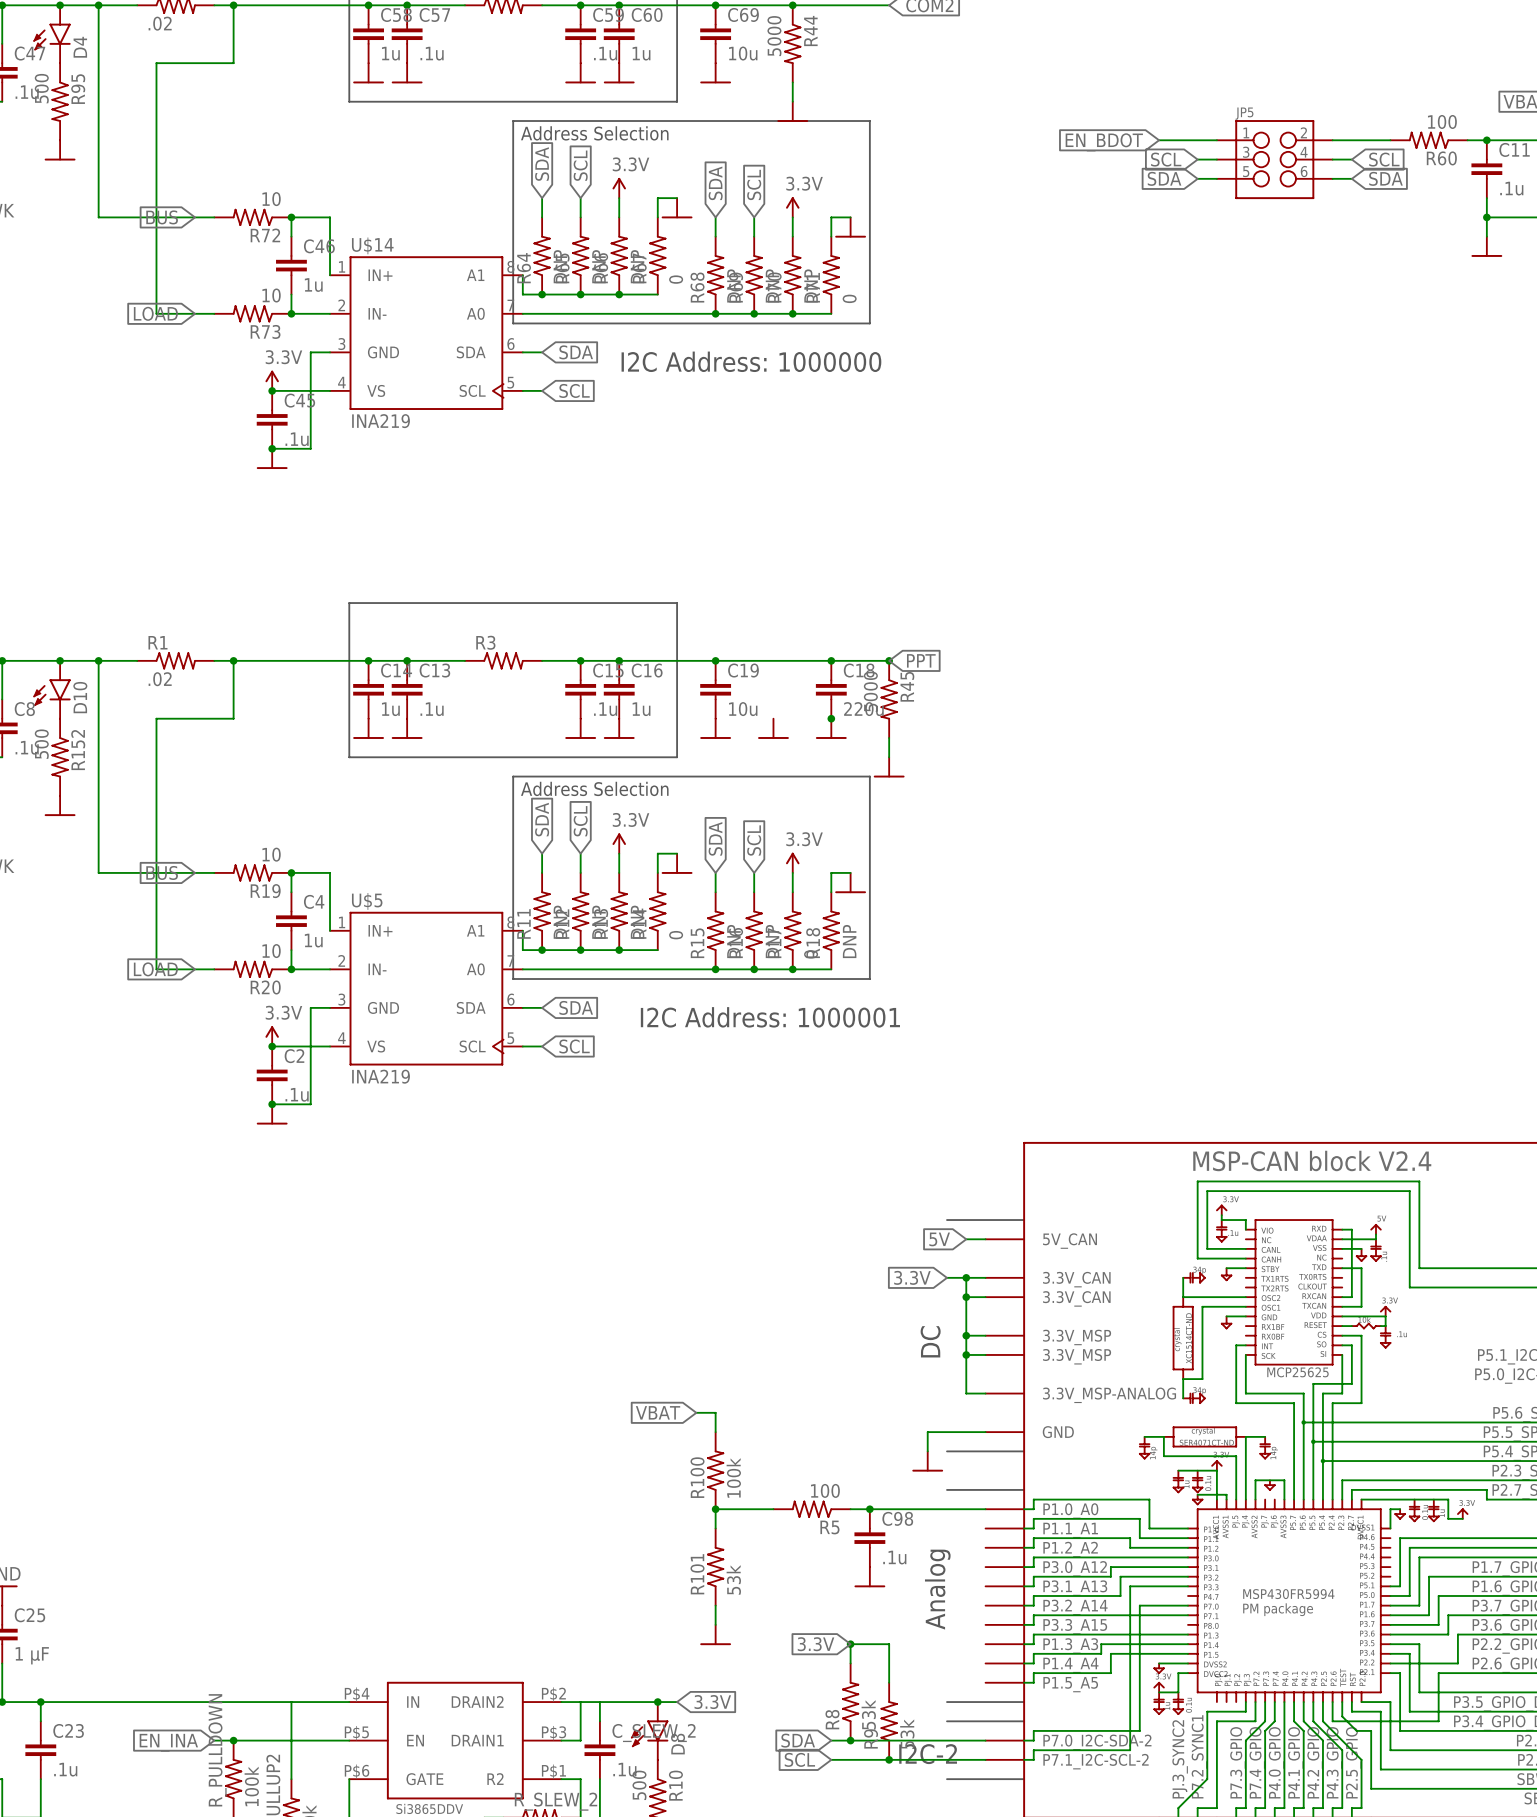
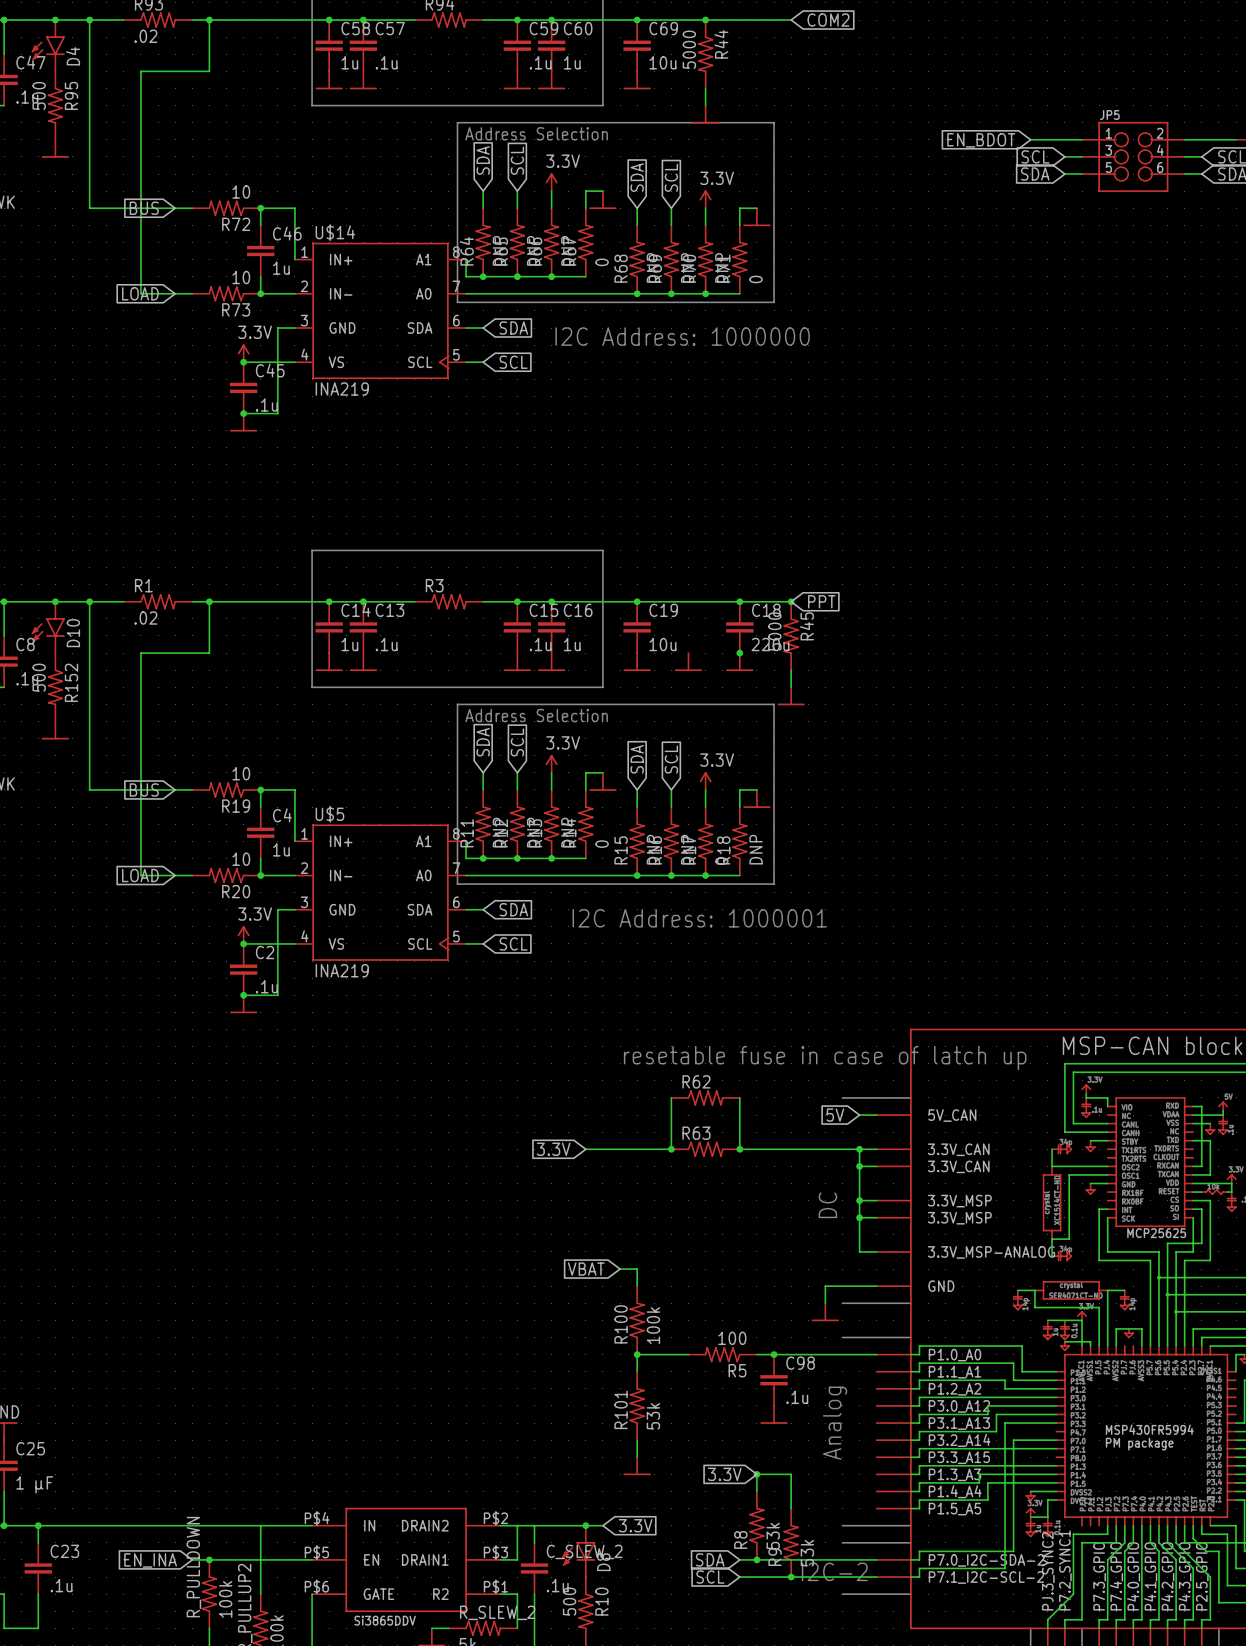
text: none -> resetable fuse in case of latch up (825, 1058)
wire: none -> (671, 1097) (671, 1149) (585, 1149)
R62: none -> (705, 1097)
wire: none -> (739, 1097) (739, 1149) (842, 1149)
global label: none -> 3.3V (553, 1149)
junction: none -> (671, 1149)
R63: none -> (705, 1149)
junction: none -> (739, 1149)
global label: 3.3V (912, 1277) -> none

